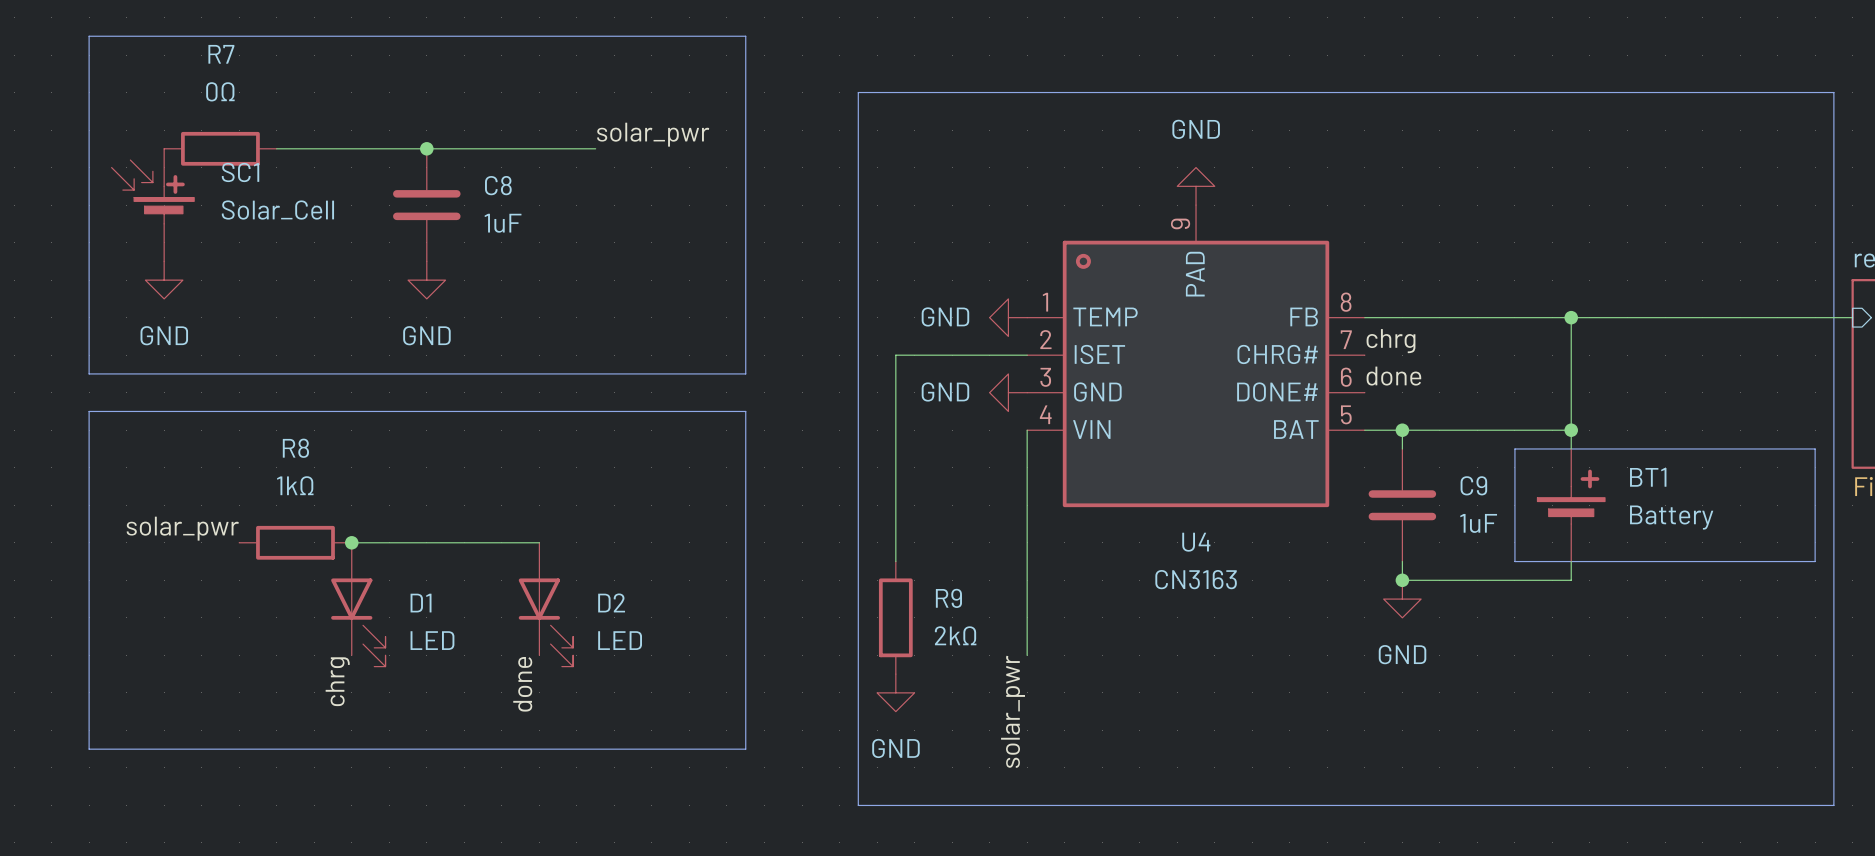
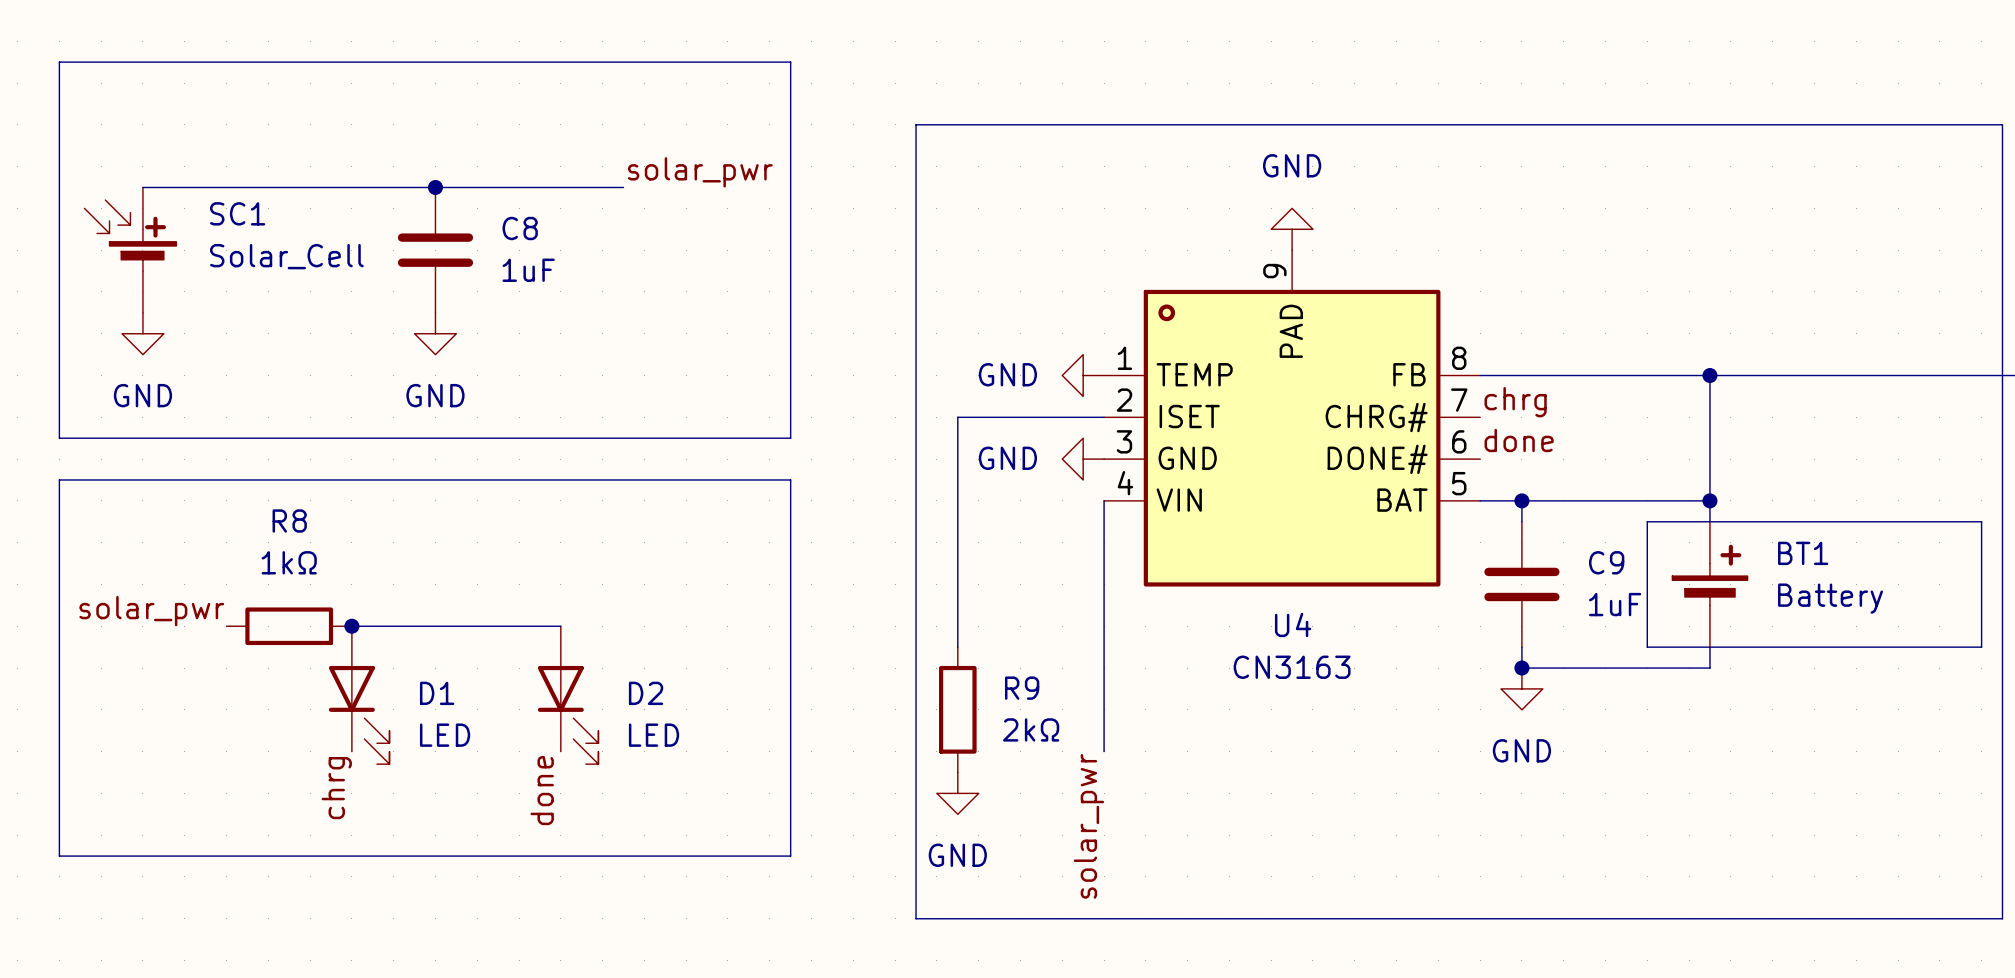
wire: none -> (142, 187) (268, 187)
R7: 0Ω (220, 148) -> none

